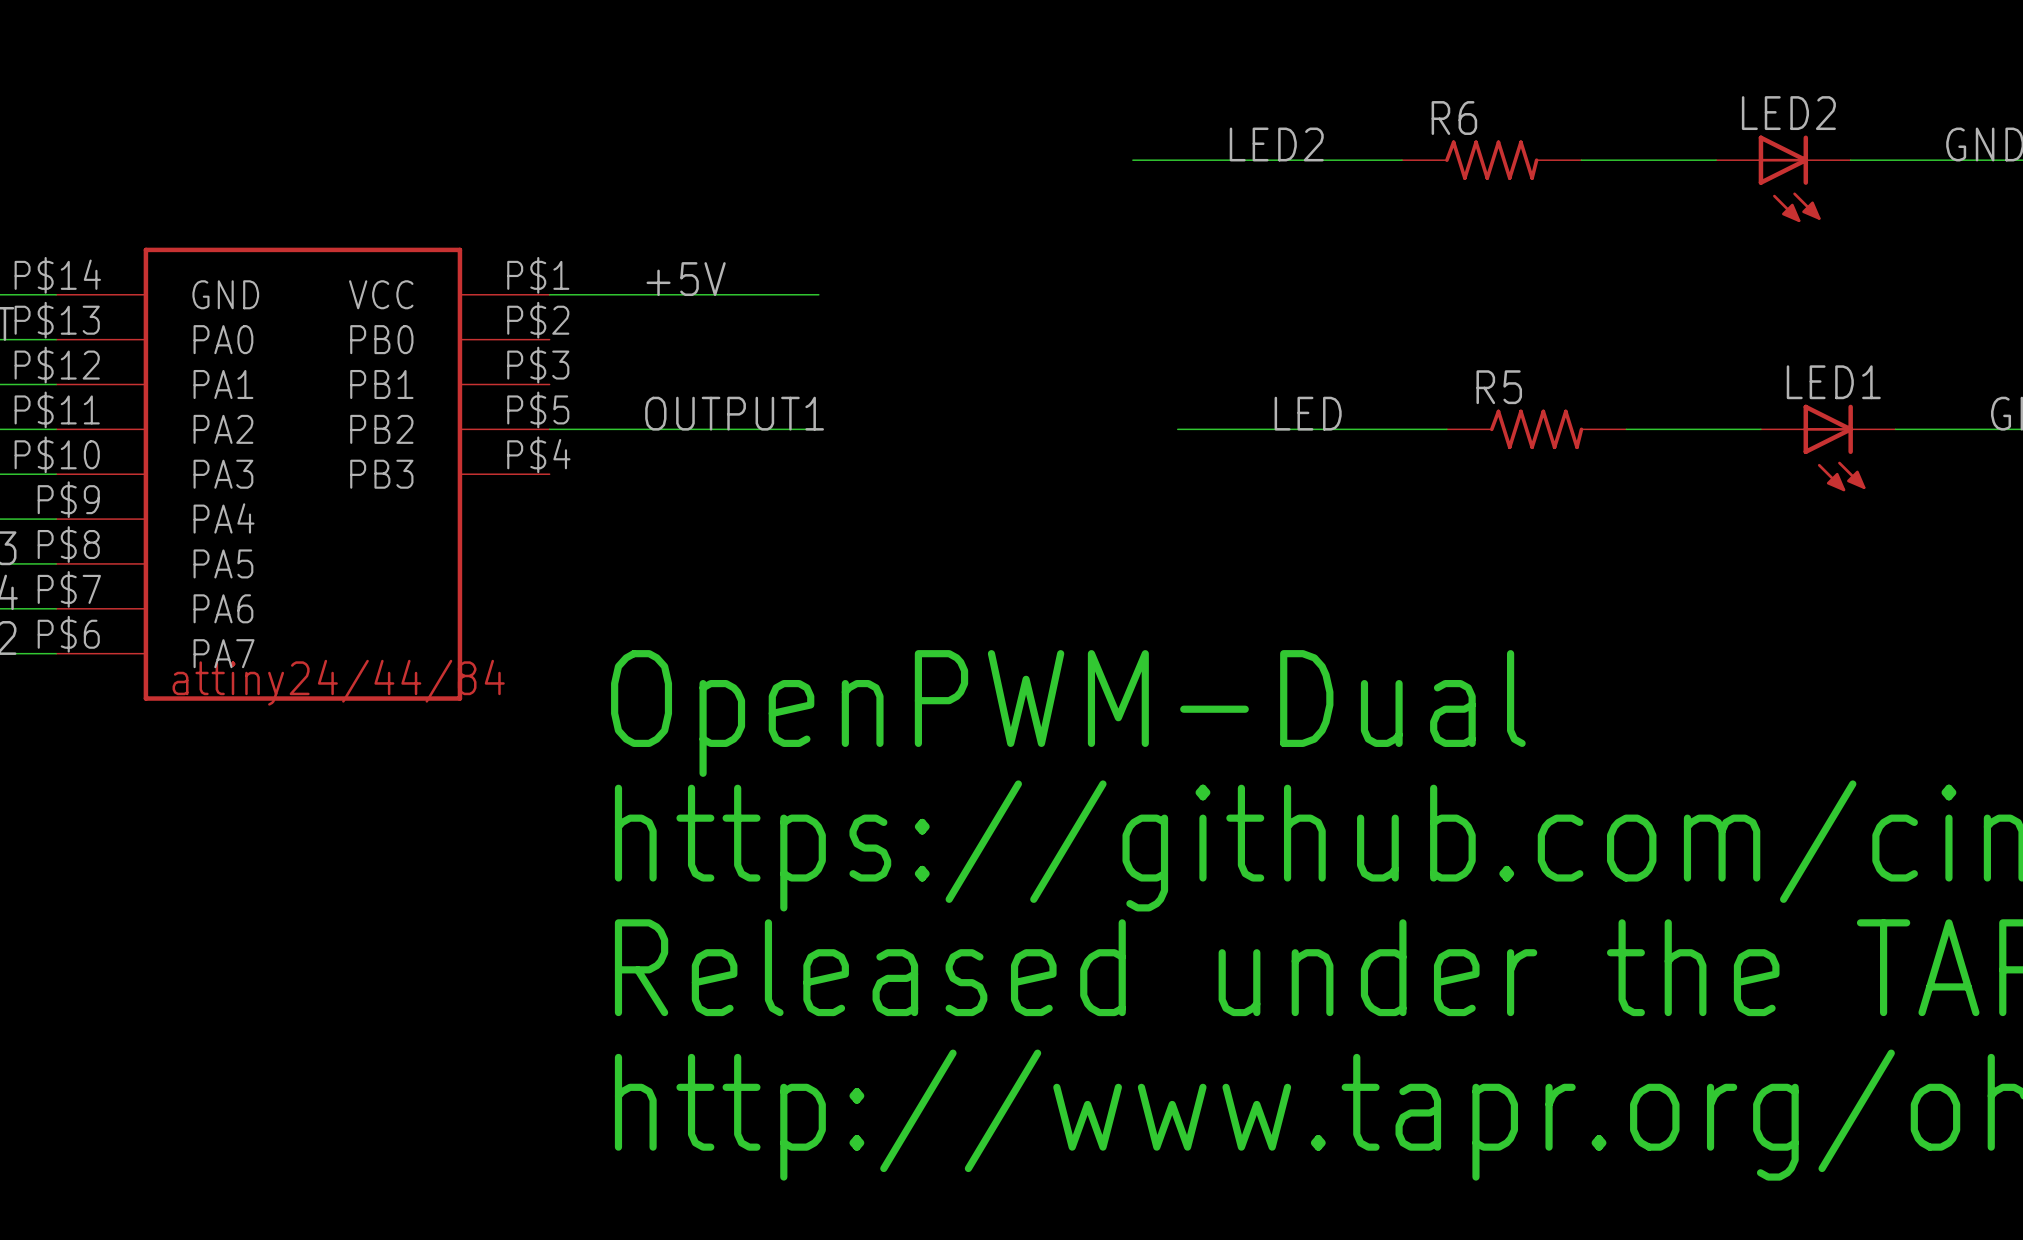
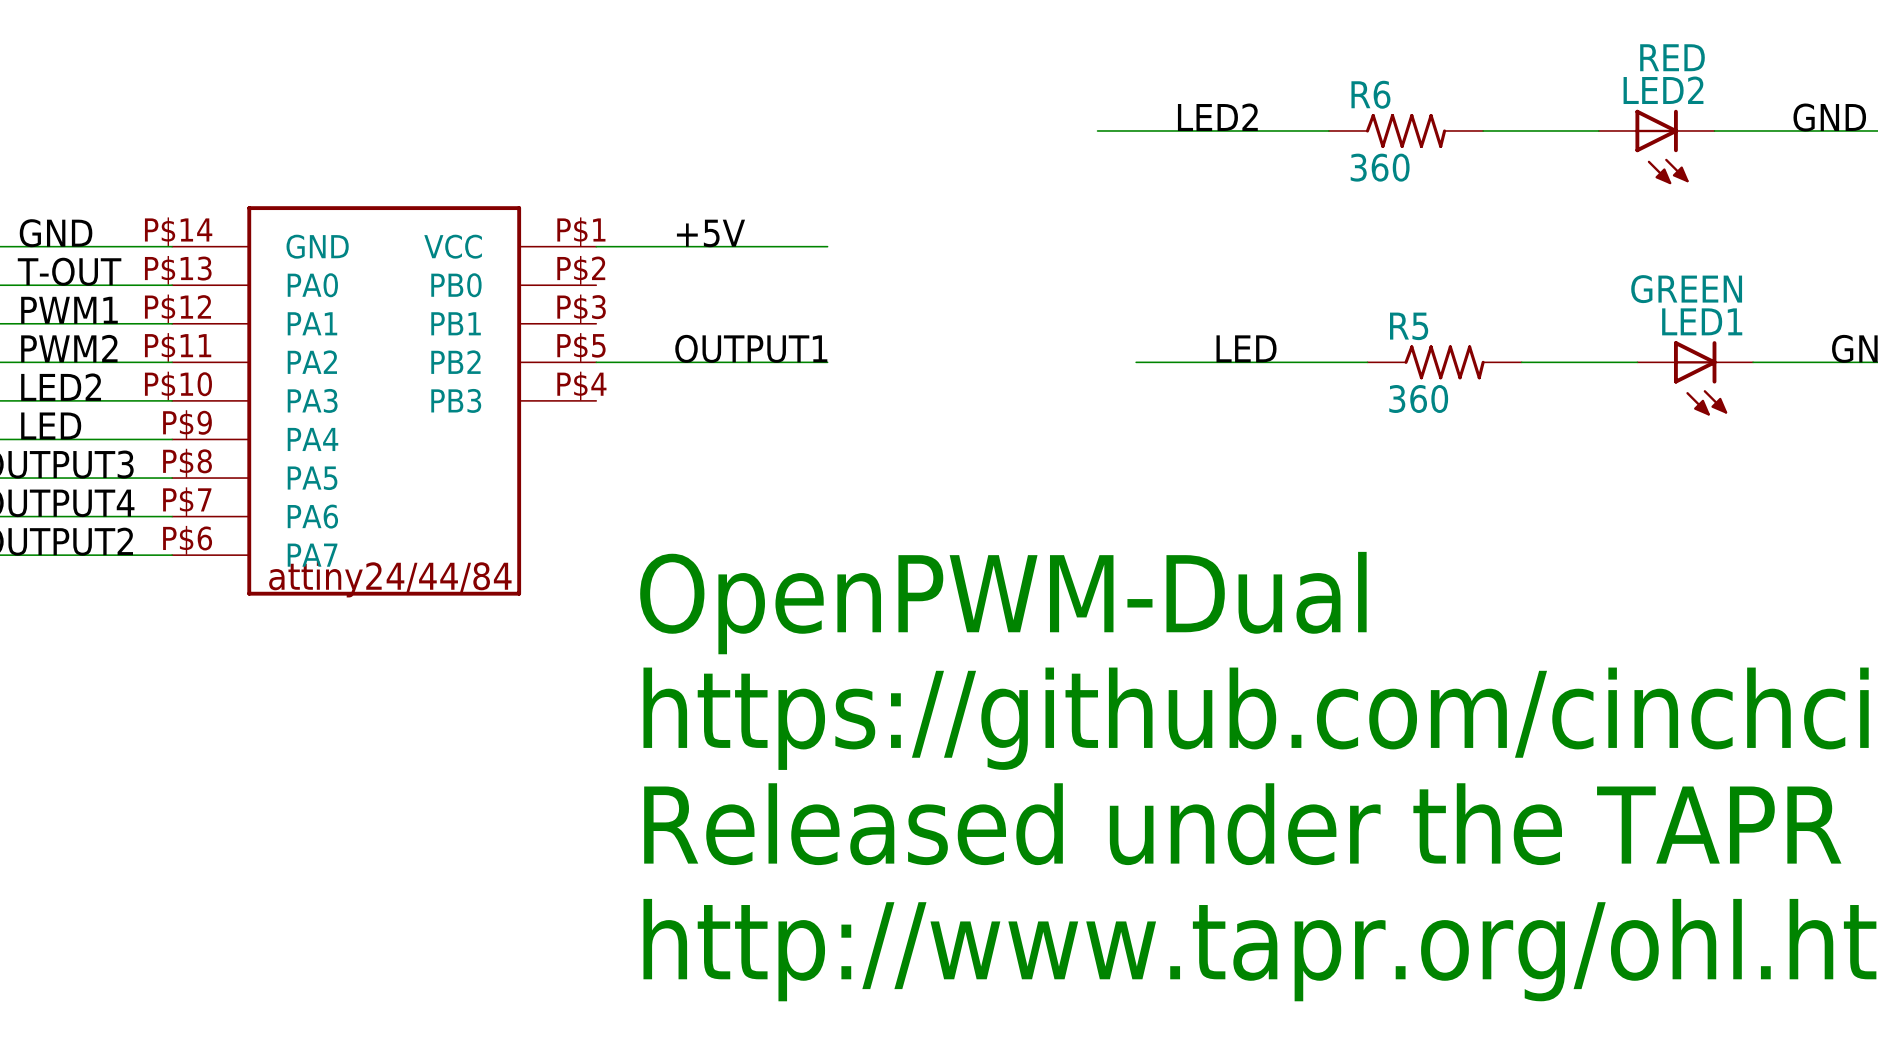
LED2 value: none -> RED (1672, 57)
R6 value: none -> 360 (1380, 167)
LED1 value: none -> GREEN (1686, 289)
R5 value: none -> 360 (1418, 398)

